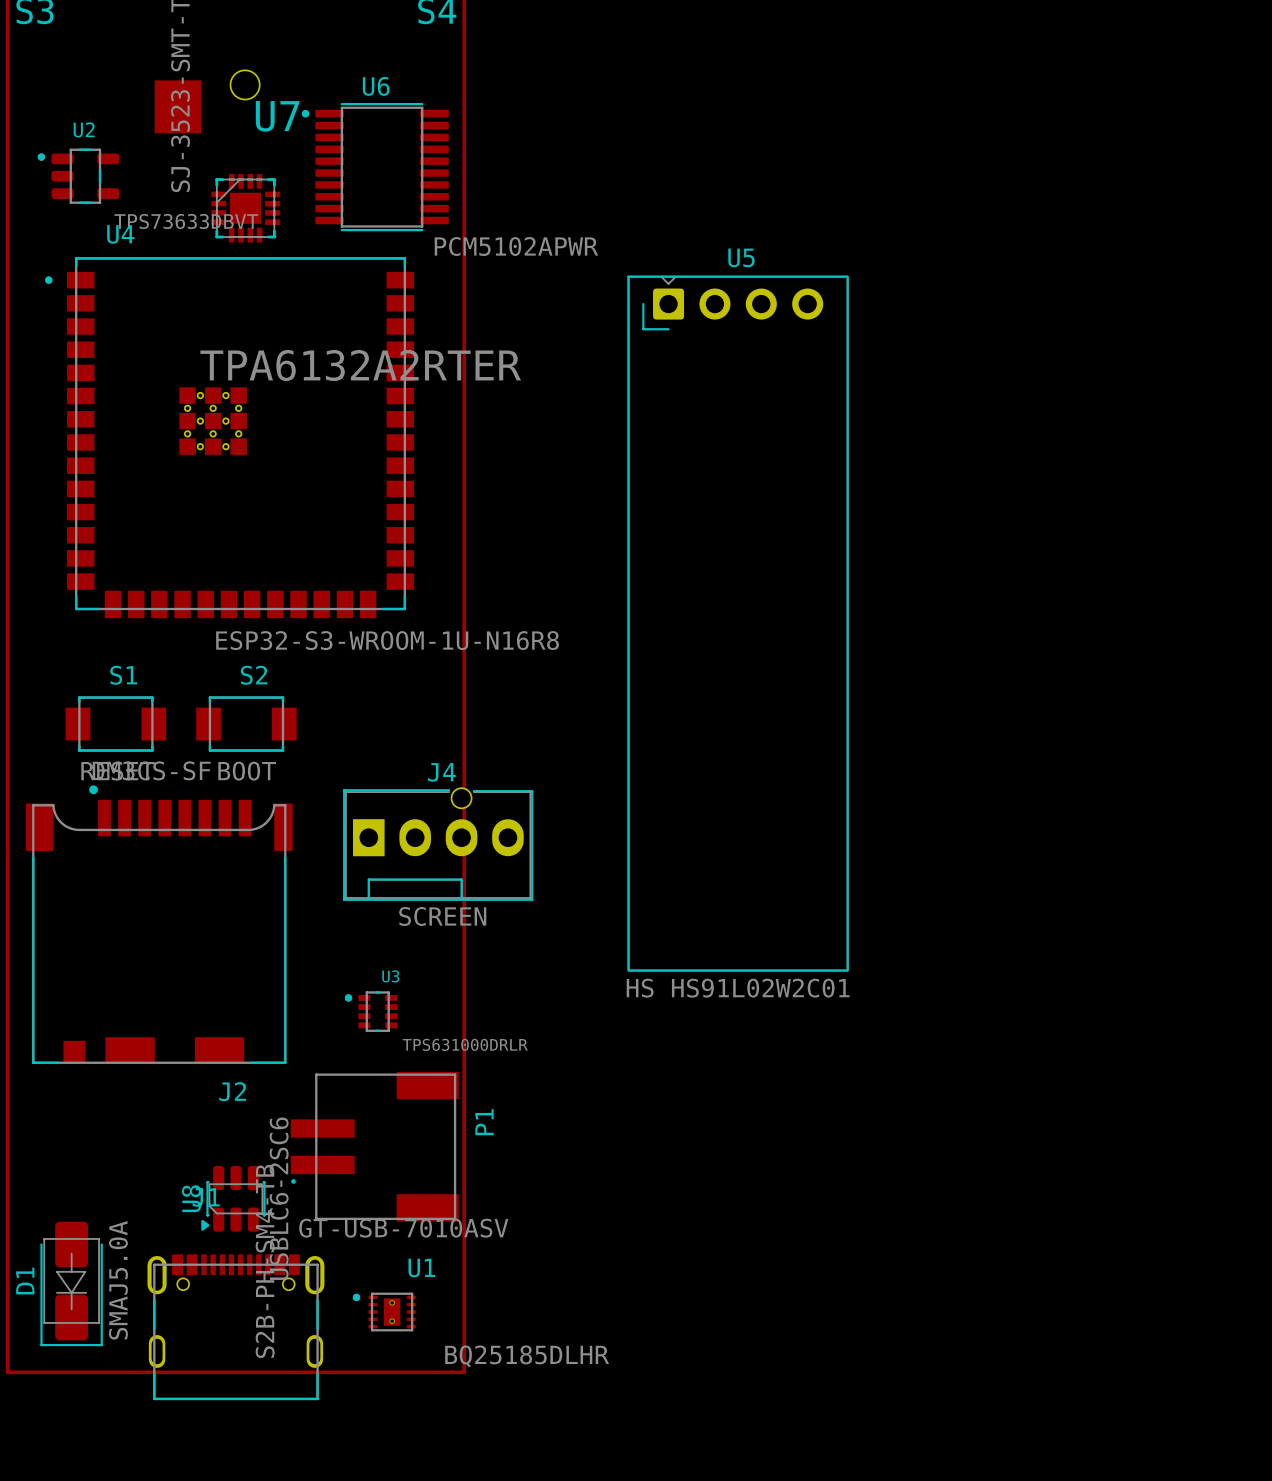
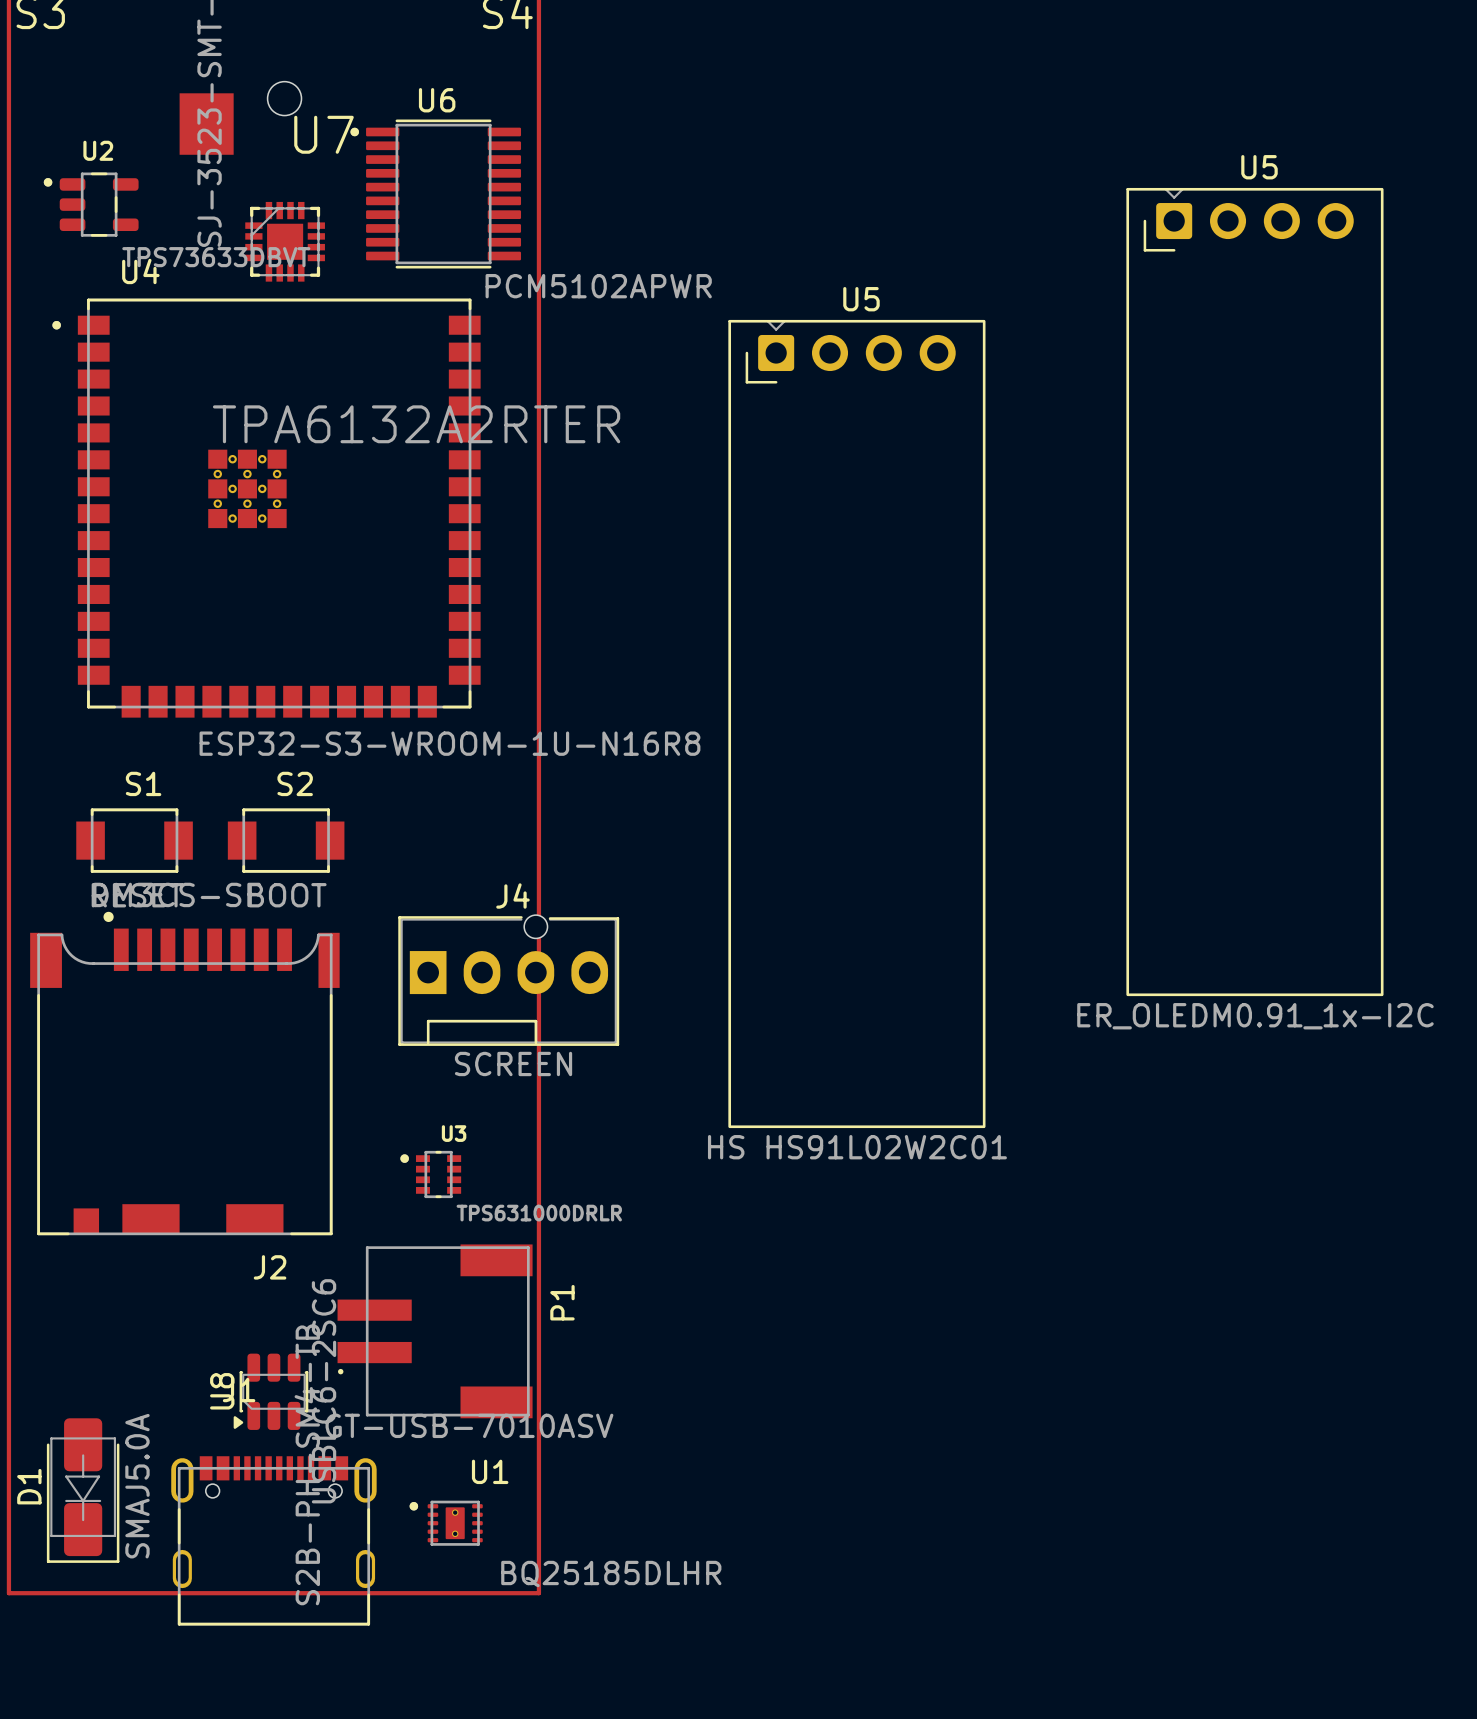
U5: none -> ER_OLEDM0.91_1x-I2C (1254, 592)

